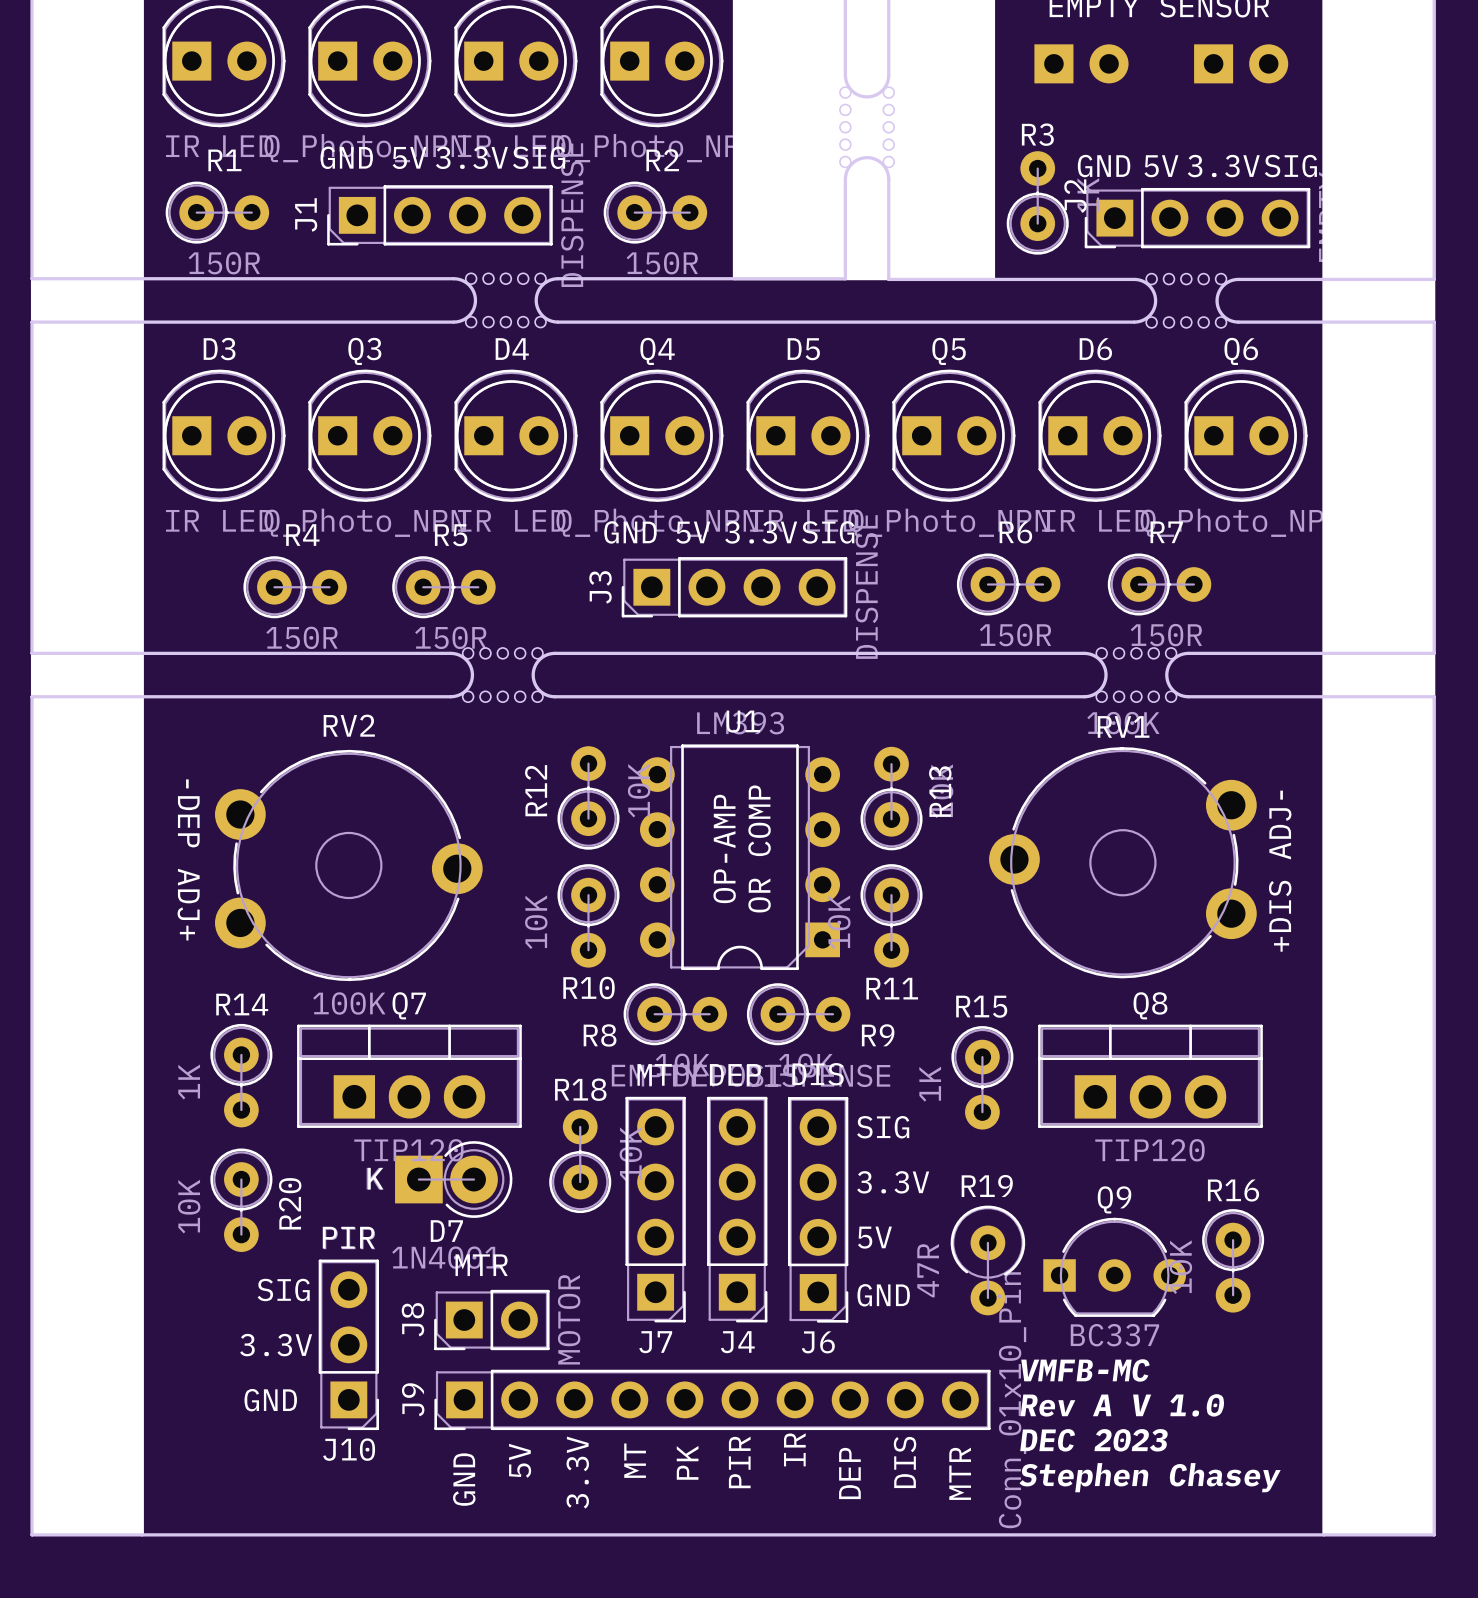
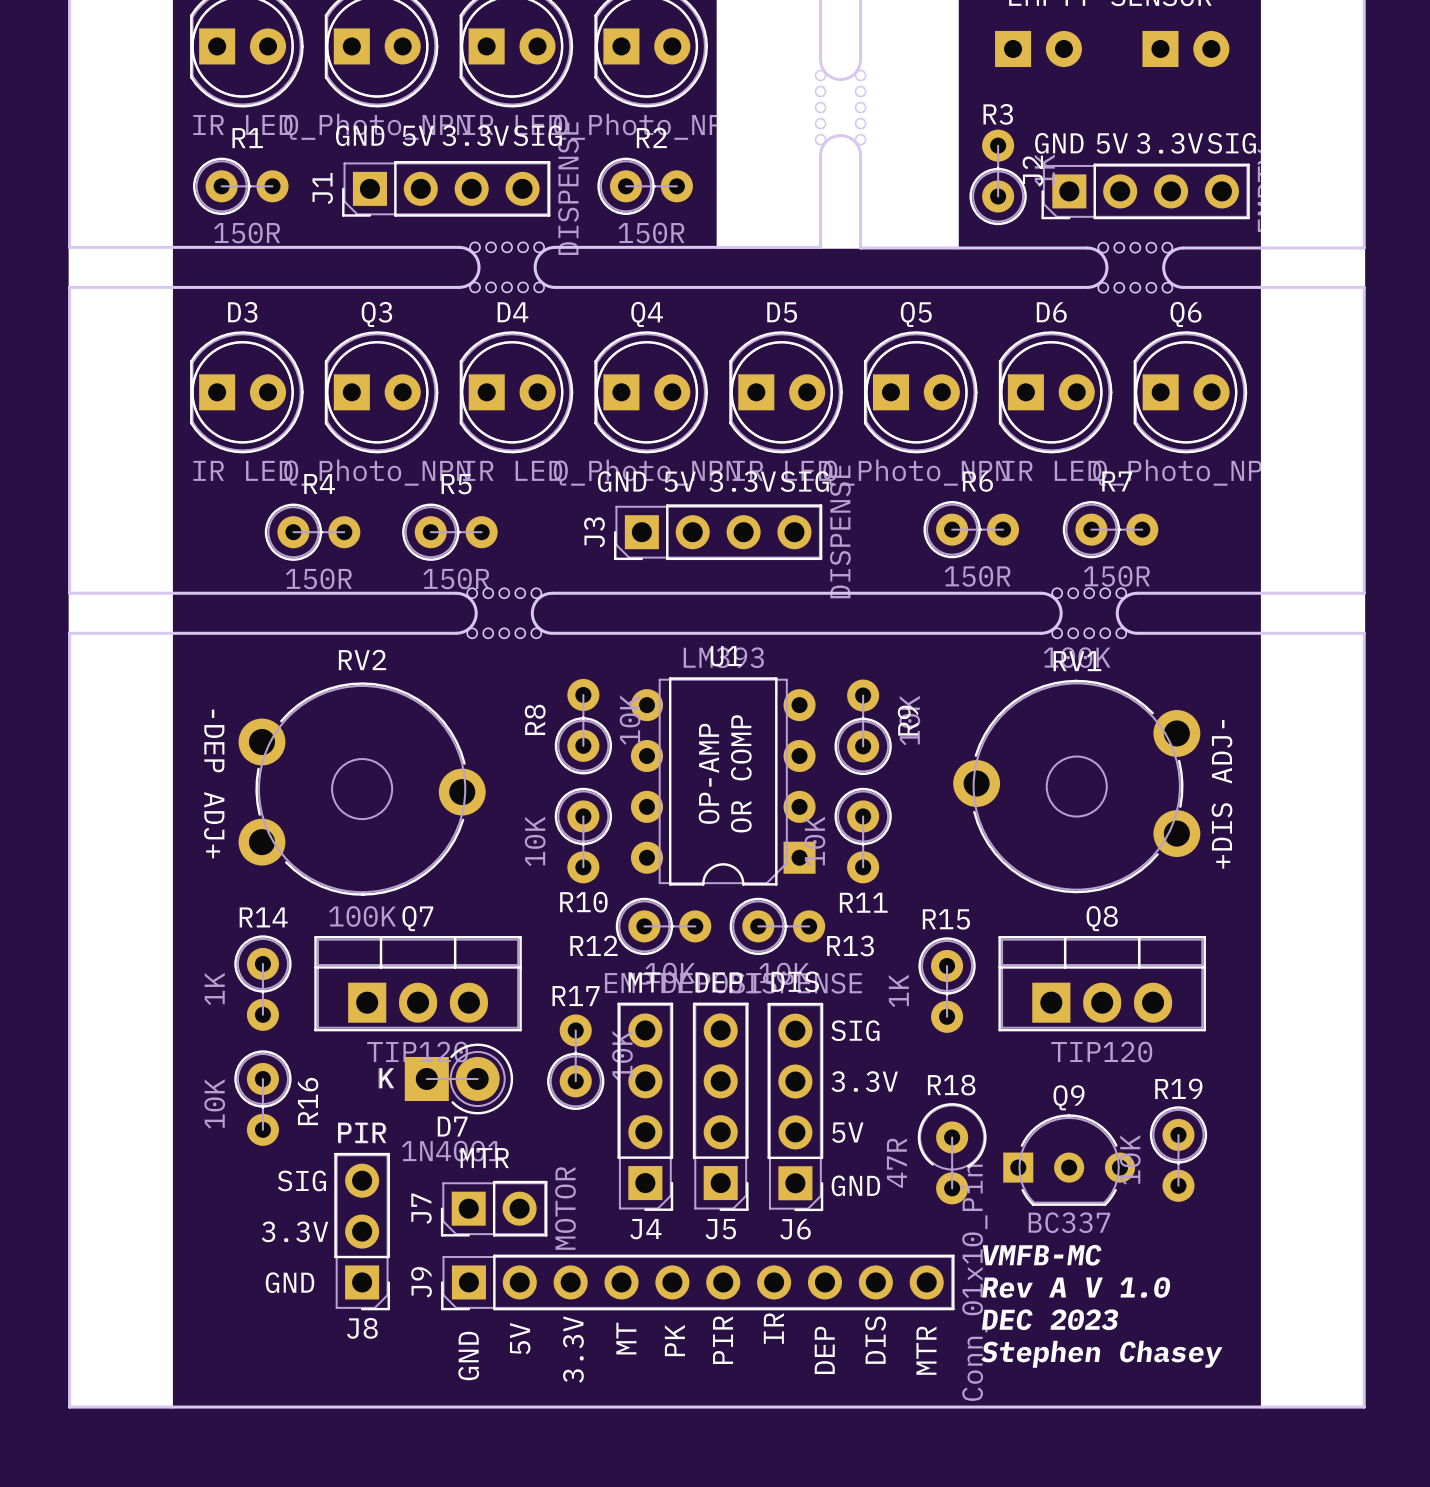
R12 name: R12 (536, 790) -> R8 (535, 719)
R13 name: R13 (940, 791) -> R9 (907, 720)
R8 name: R8 (600, 1035) -> R12 (593, 945)
R9 name: R9 (878, 1035) -> R13 (850, 945)
R18 name: R18 (580, 1089) -> R17 (576, 996)
R19 name: R19 (987, 1185) -> R18 (951, 1085)
R16 name: R16 (1233, 1190) -> R19 (1178, 1088)
R20 name: R20 (290, 1203) -> R16 (308, 1101)
J8 name: J8 (412, 1319) -> J7 (421, 1208)
J7 name: J7 (655, 1342) -> J4 (645, 1229)
J4 name: J4 (737, 1342) -> J5 (720, 1229)
J10 name: J10 (349, 1449) -> J8 (362, 1328)

